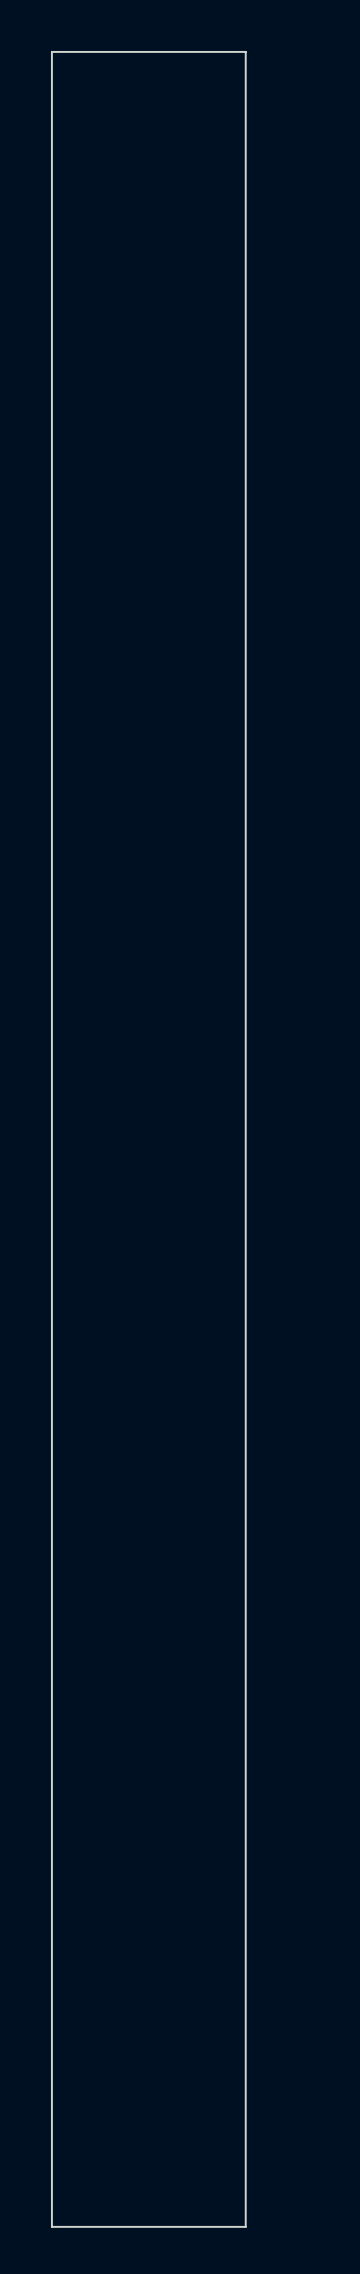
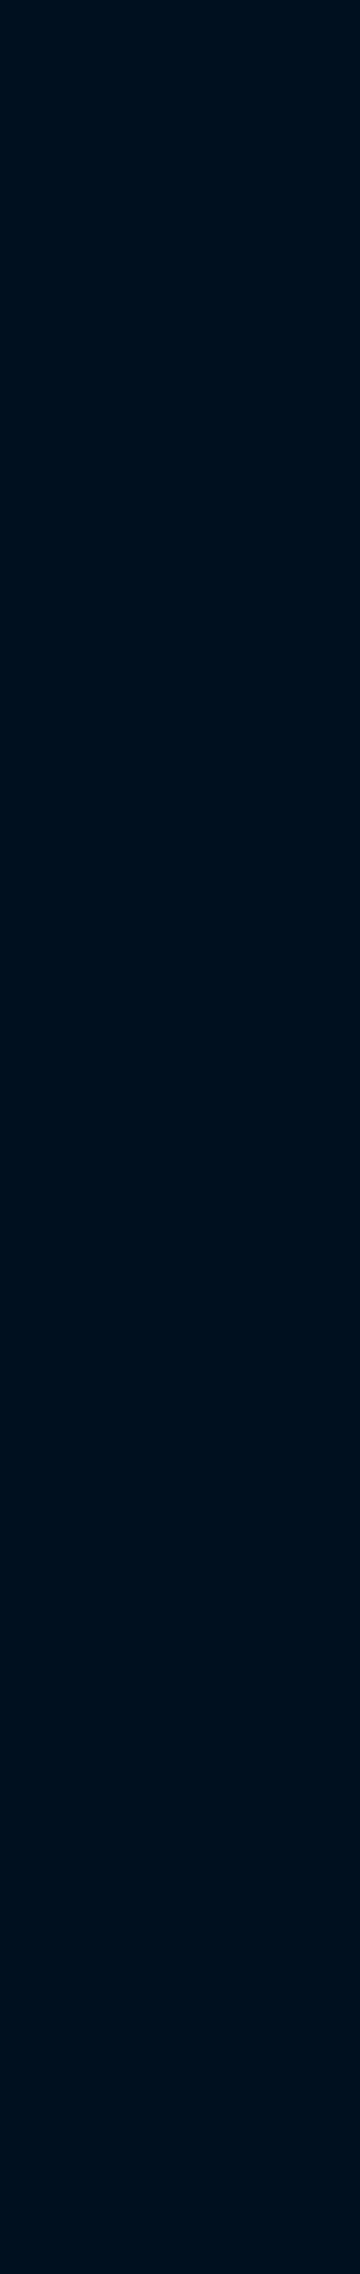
board edge: (245, 51) (245, 2226) (51, 2226) (51, 51) (245, 51) -> none

